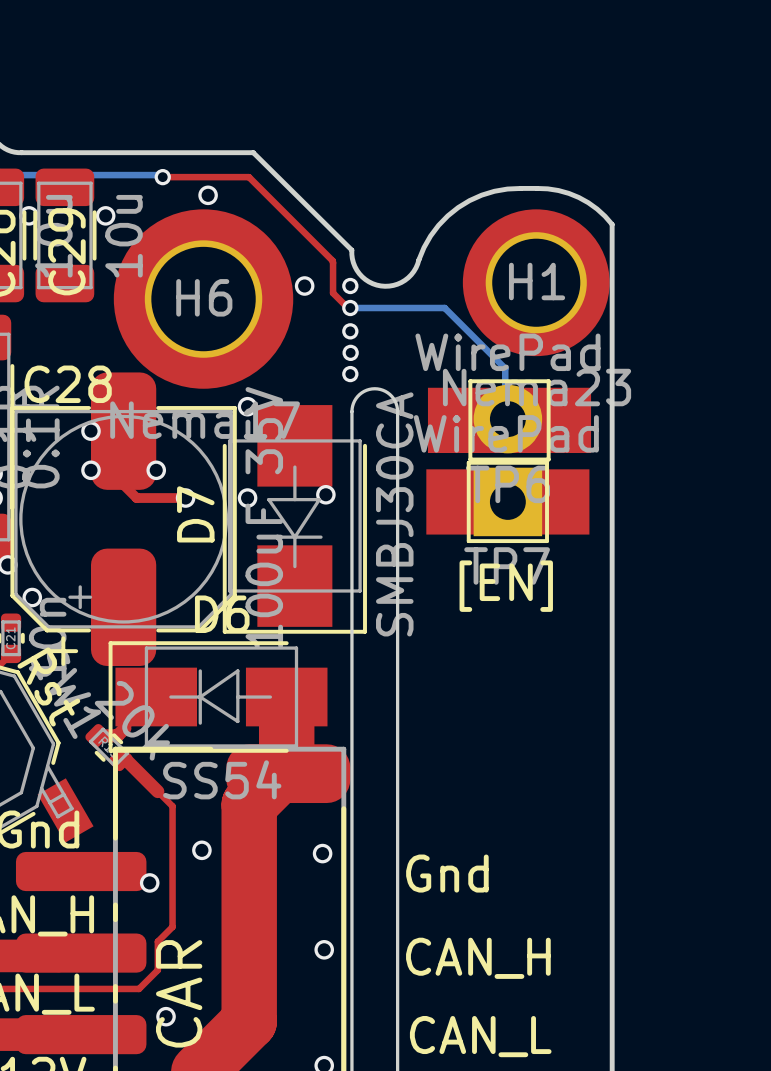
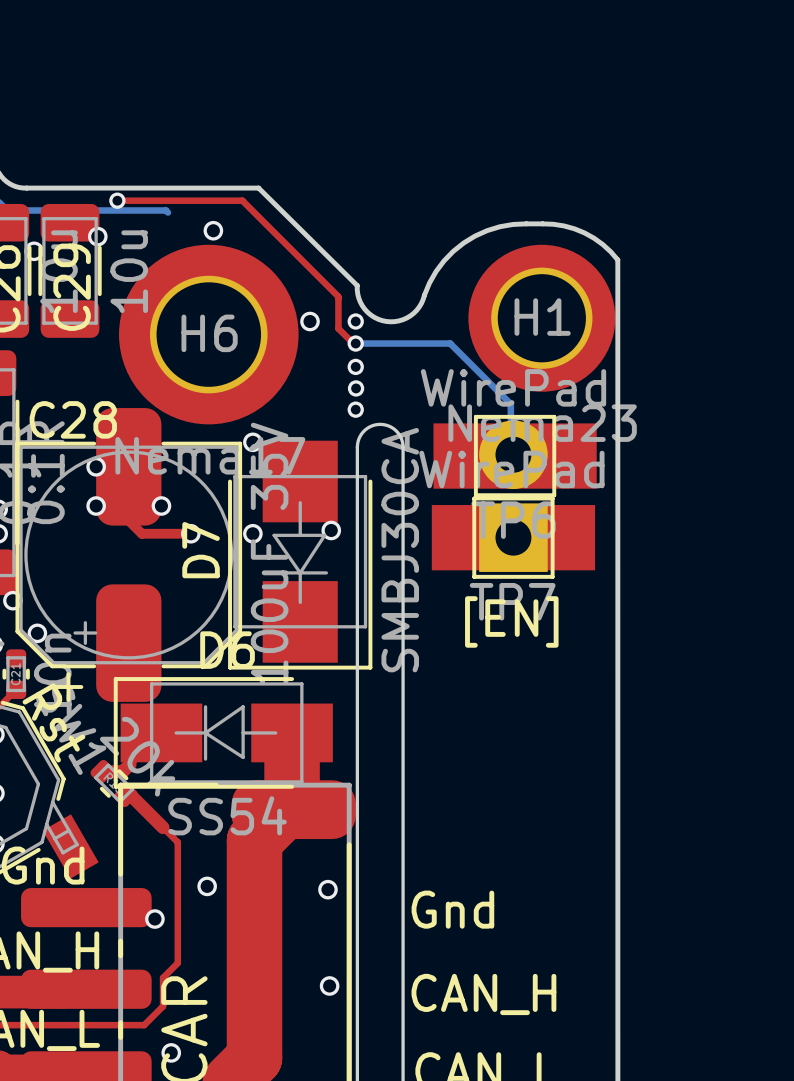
top track: (162, 177) (248, 177) -> (117, 200) (242, 200) (254, 212)
via position: (162, 177) -> (117, 200)
via position: (105, 215) -> (97, 236)

